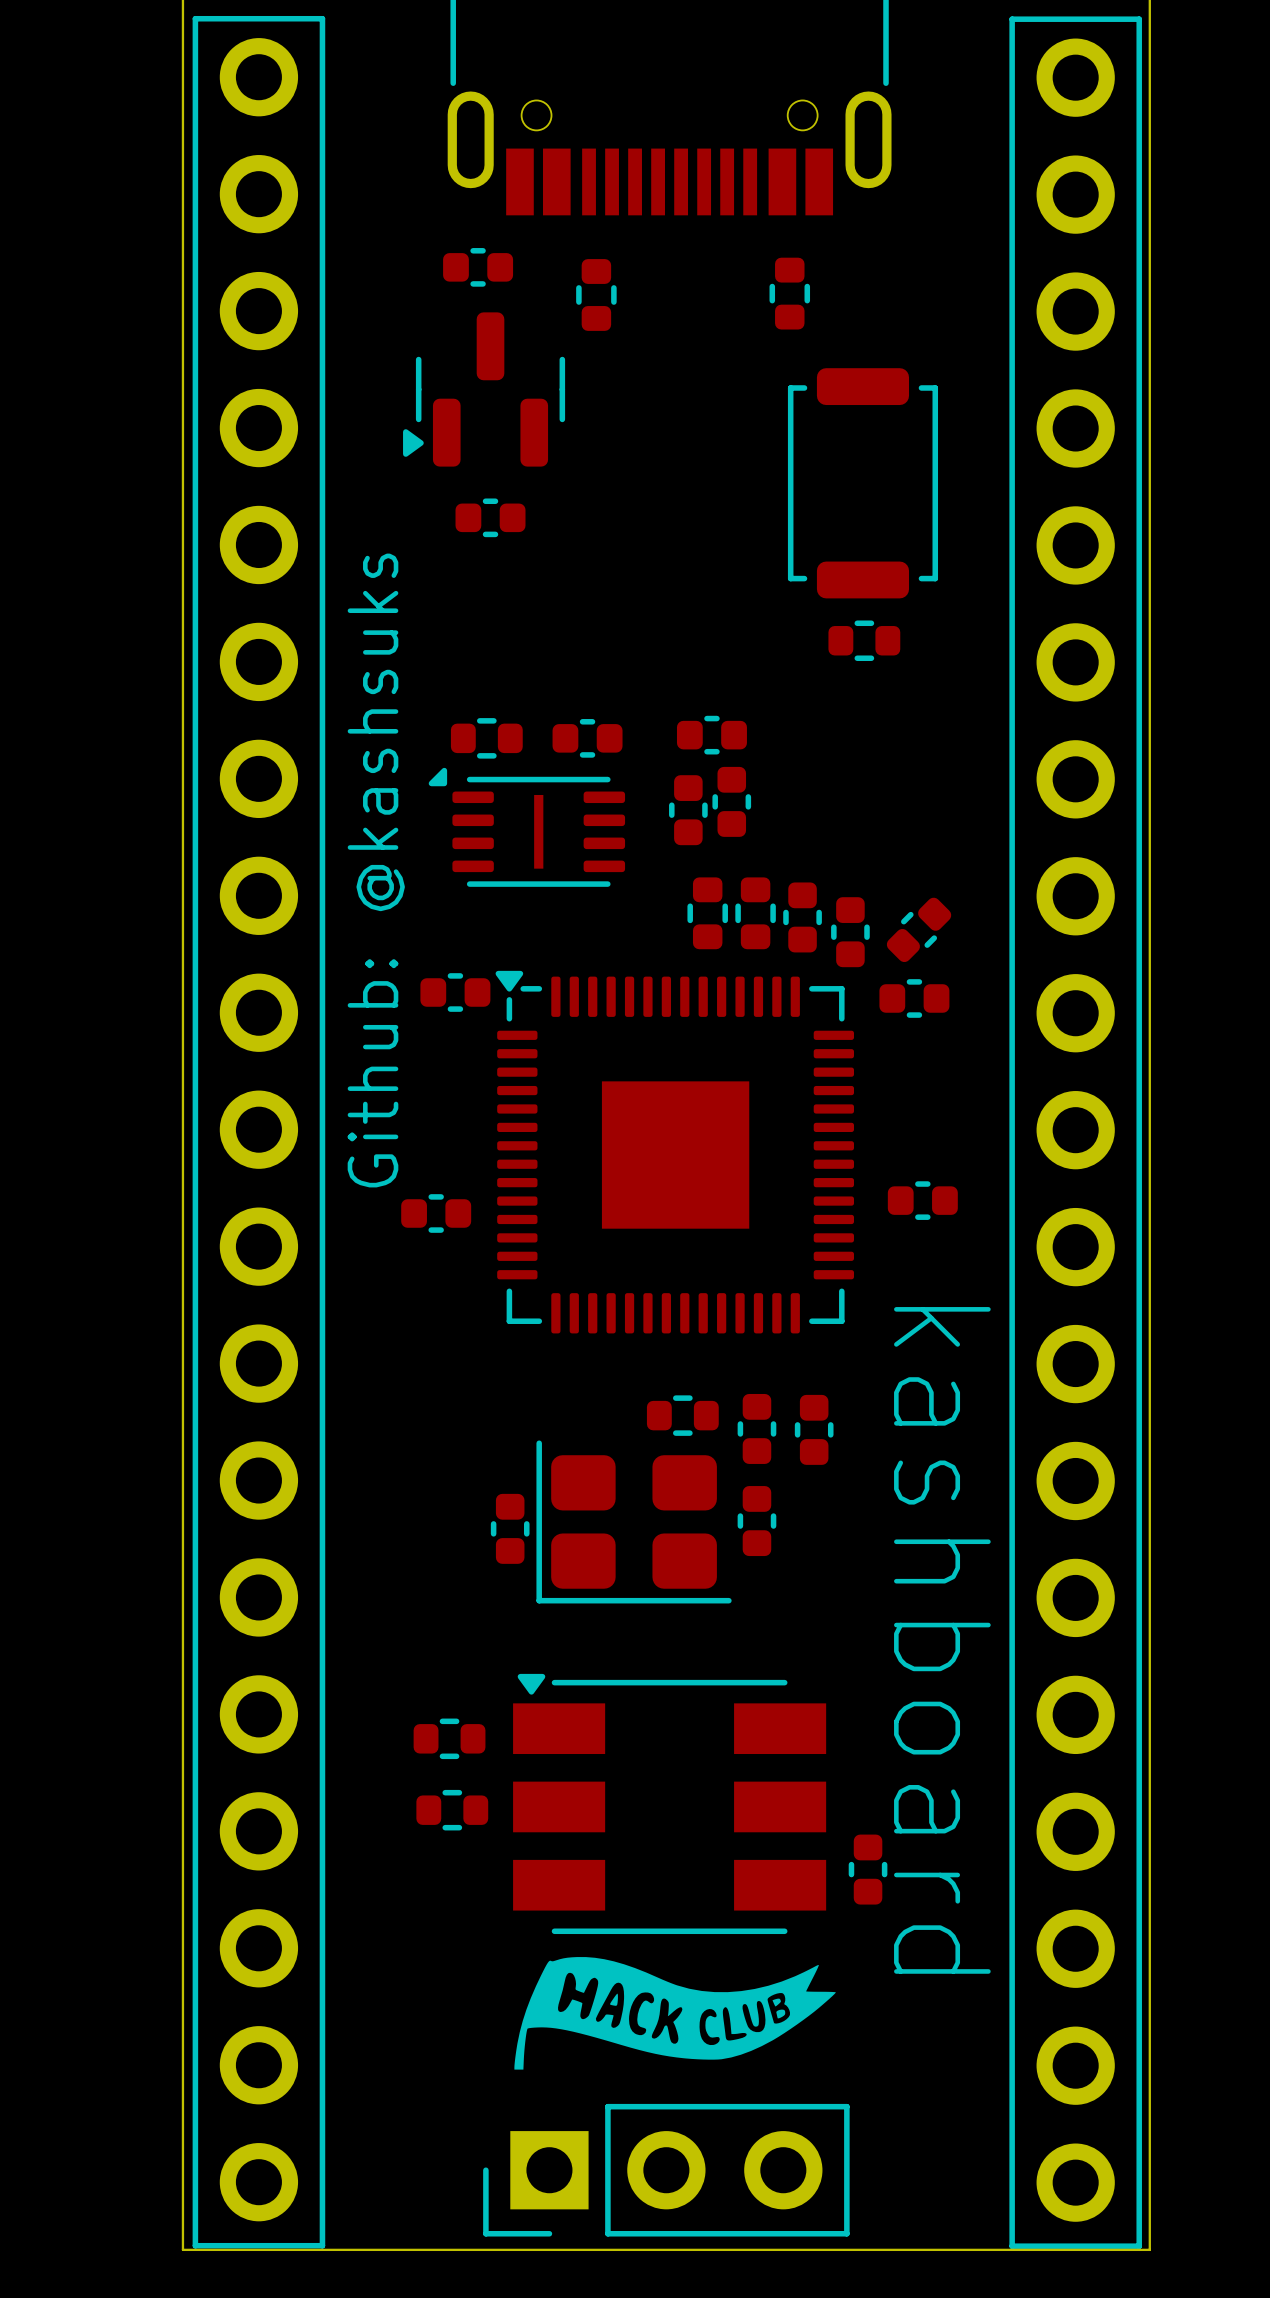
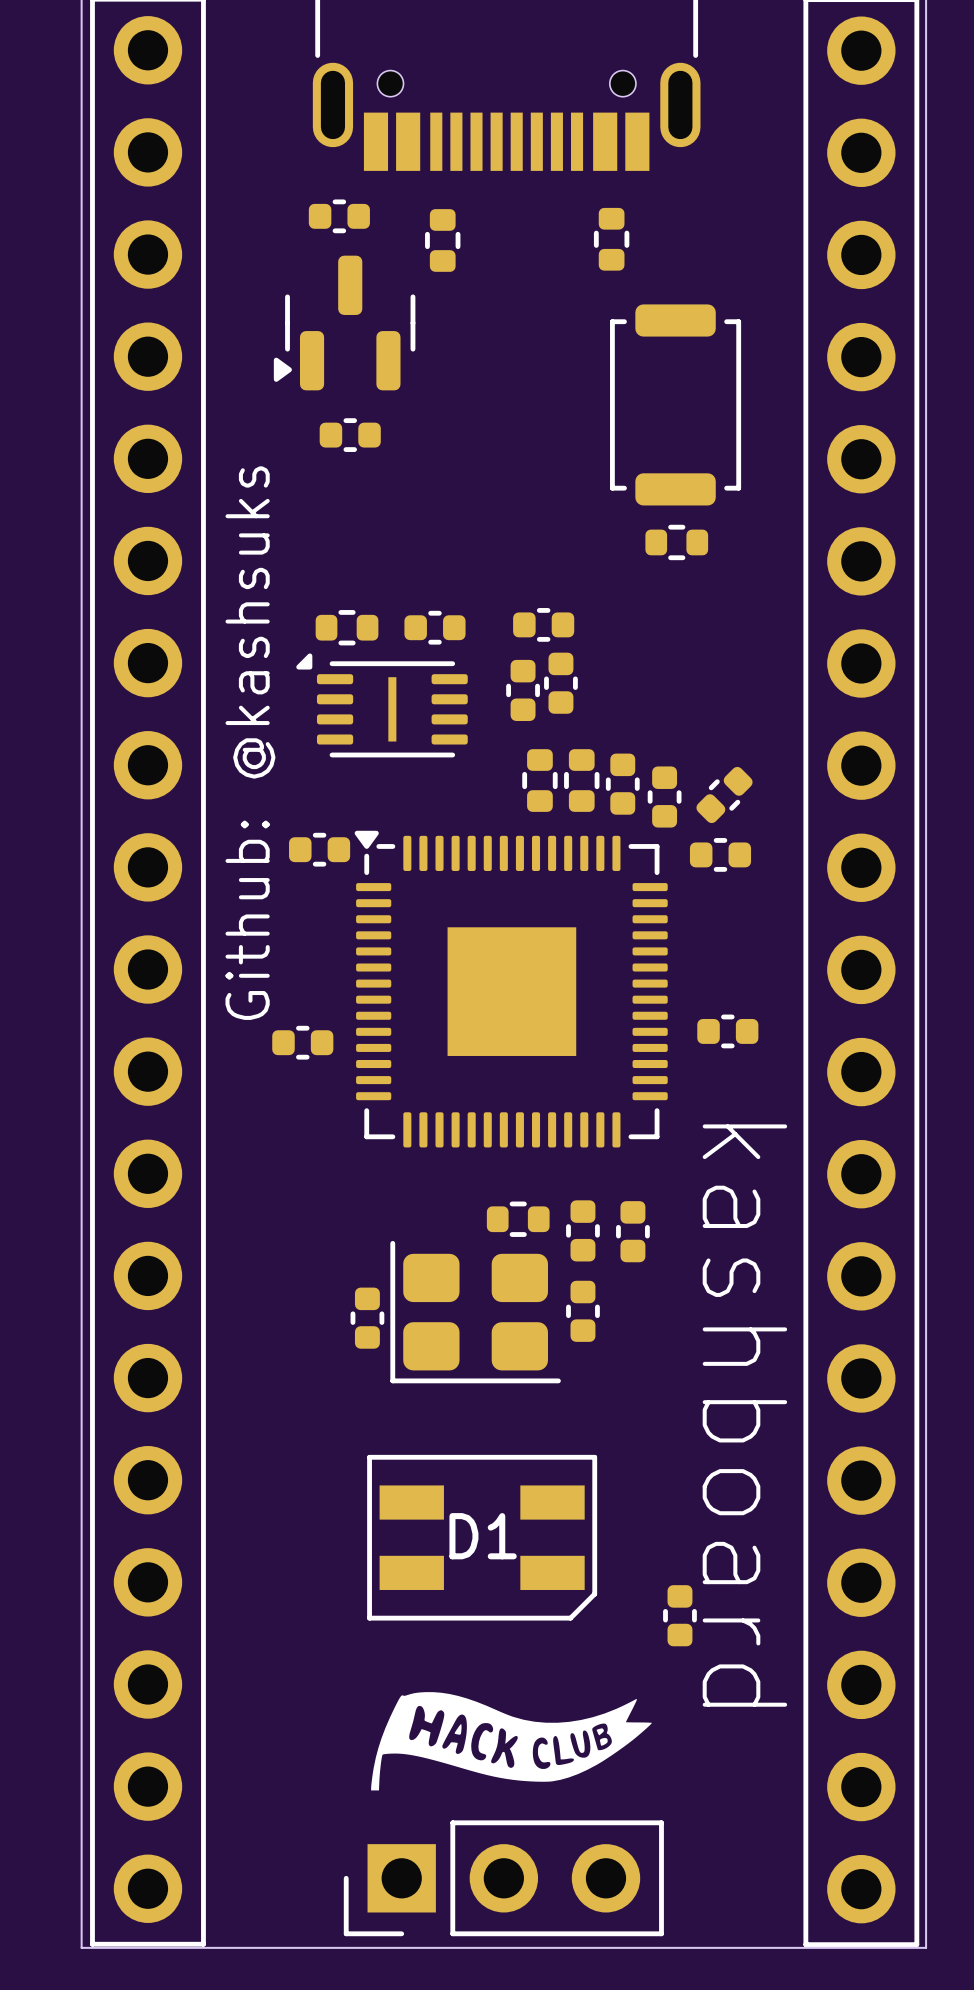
part: (449, 1738) -> none
D1: none -> (482, 1537)
part: (669, 1803) -> none
part: (452, 1810) -> none

